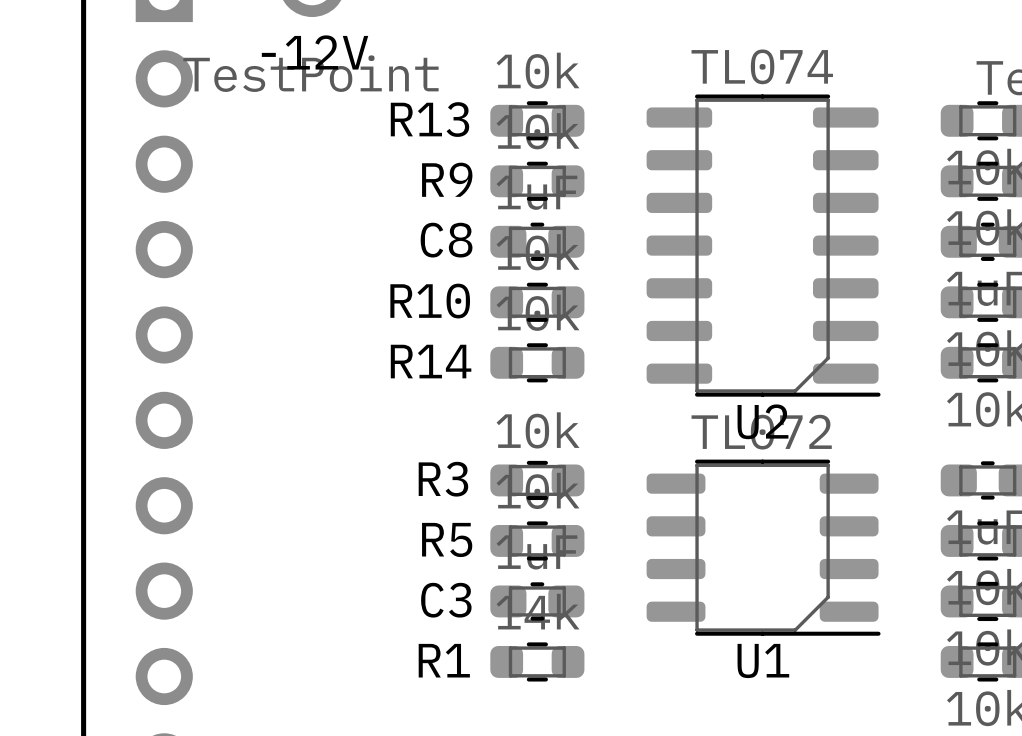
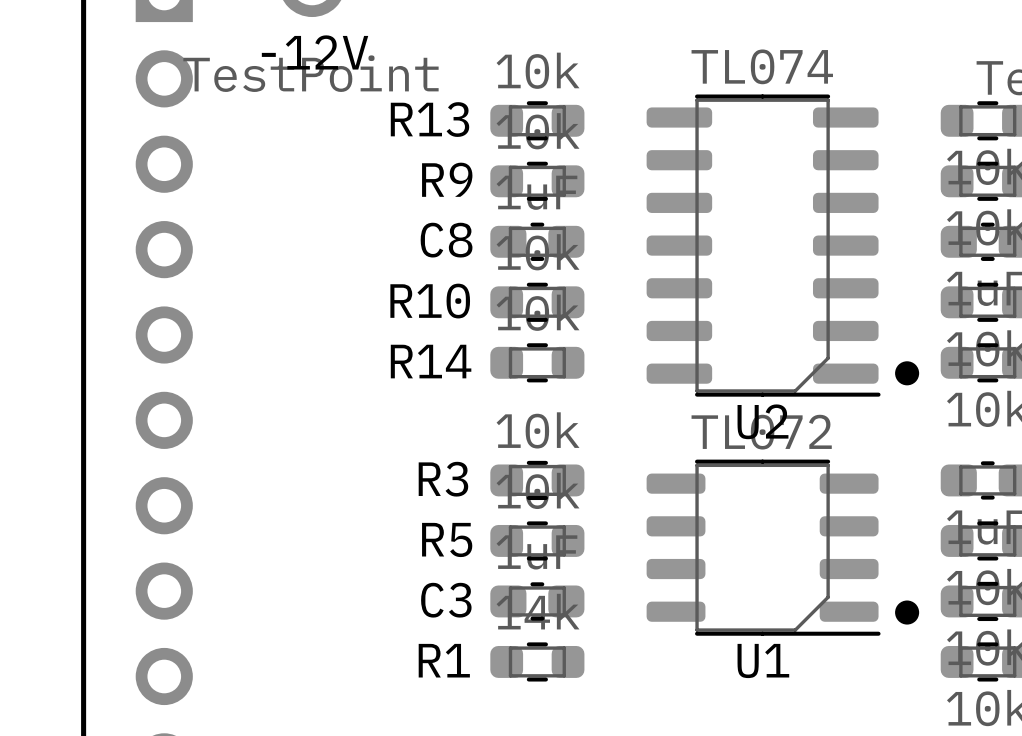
drawing: none -> [895, 361, 920, 386]
drawing: none -> [895, 600, 920, 625]

